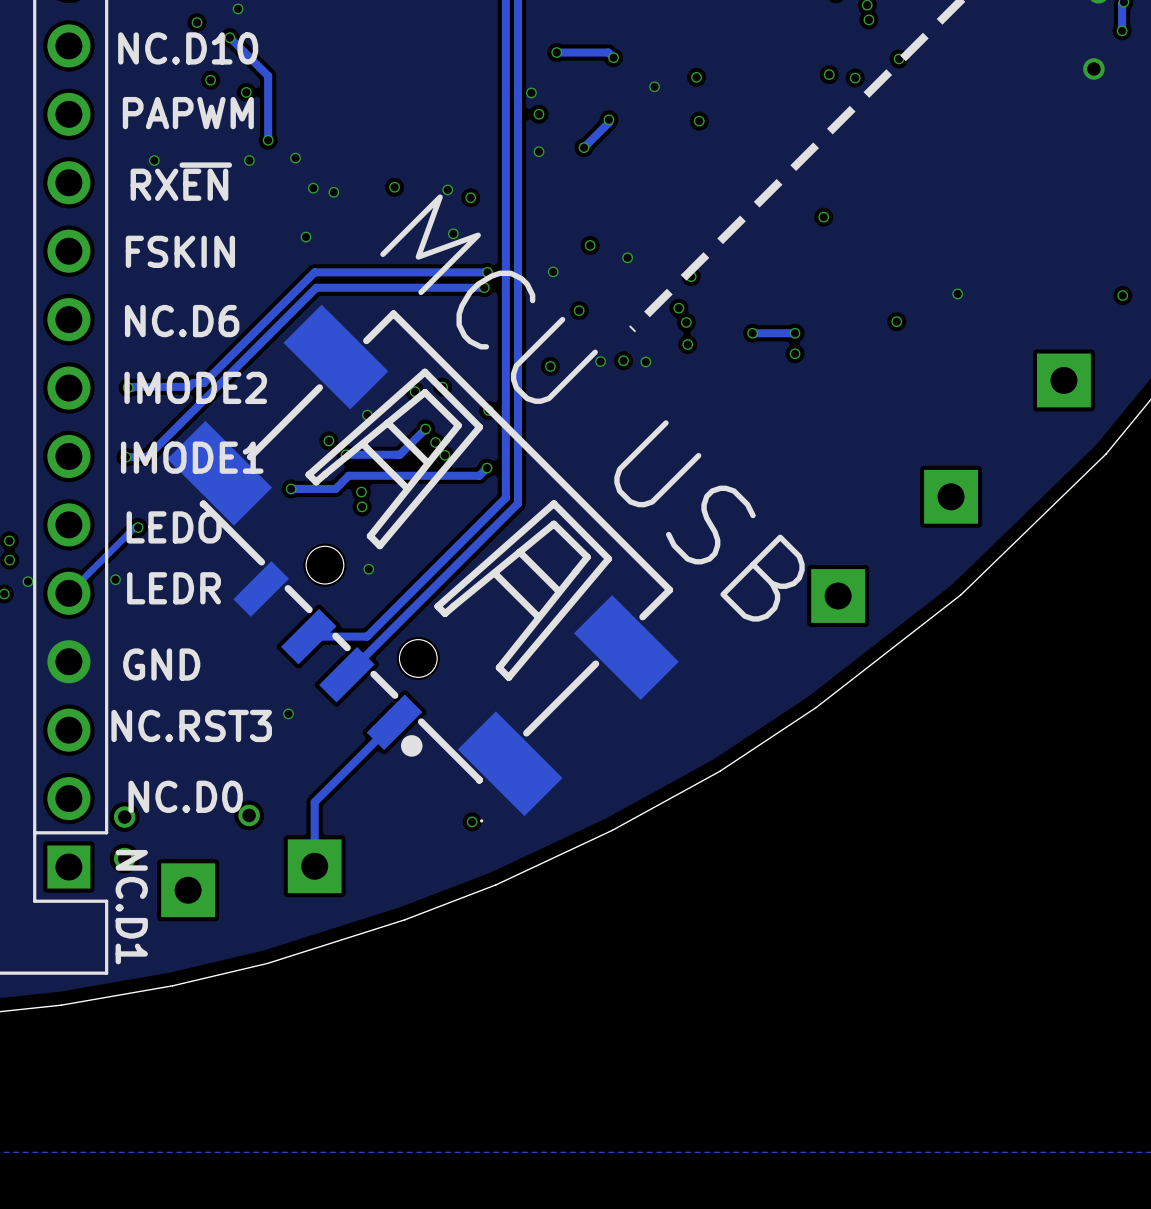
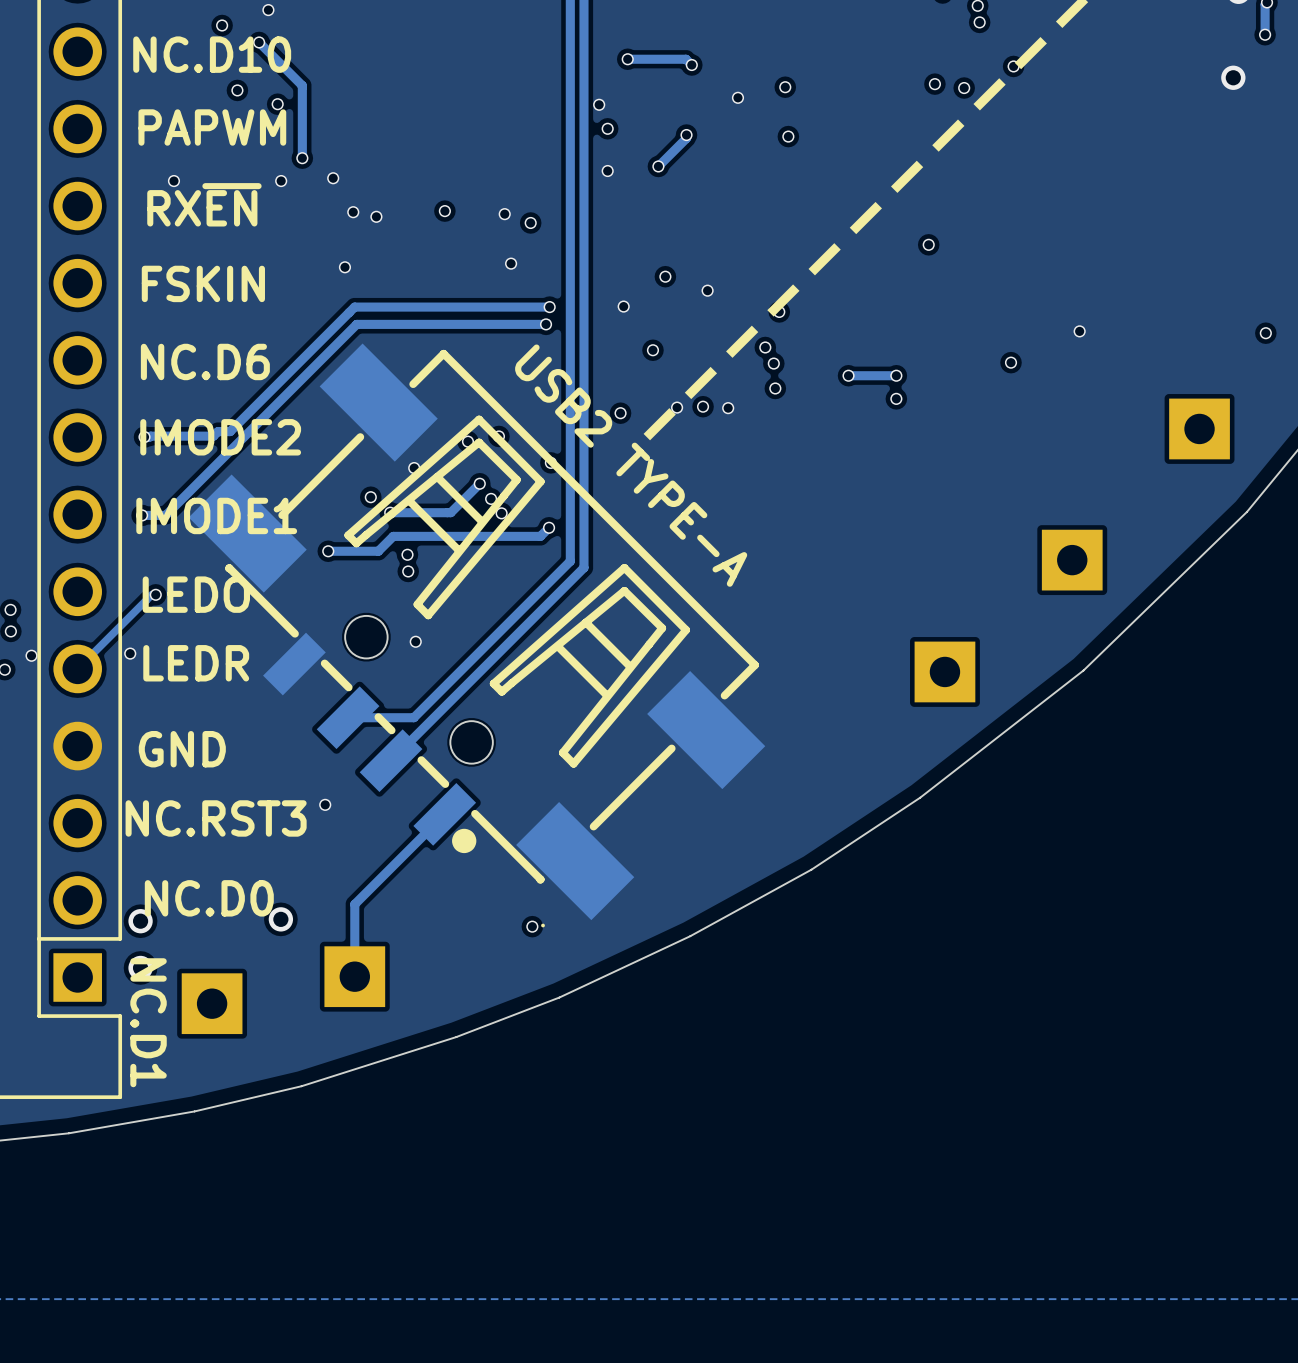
line: none -> (712, 371) (645, 438)
text: MCU USB (592, 408) -> none
text: none -> USB2 TYPE-A (631, 465)

